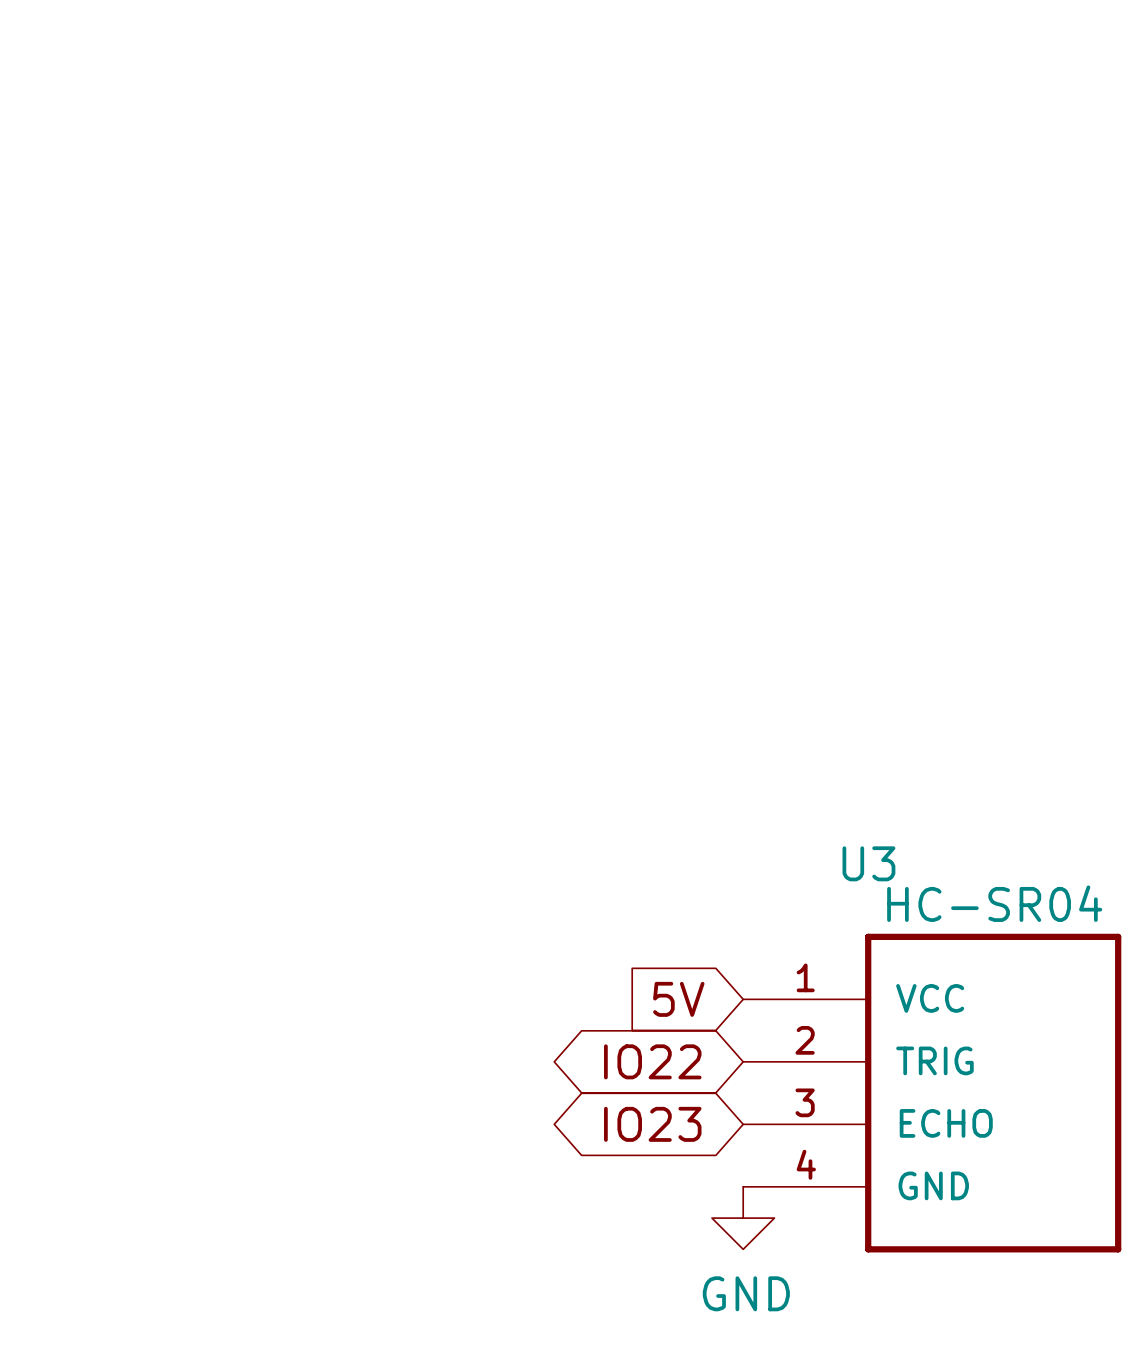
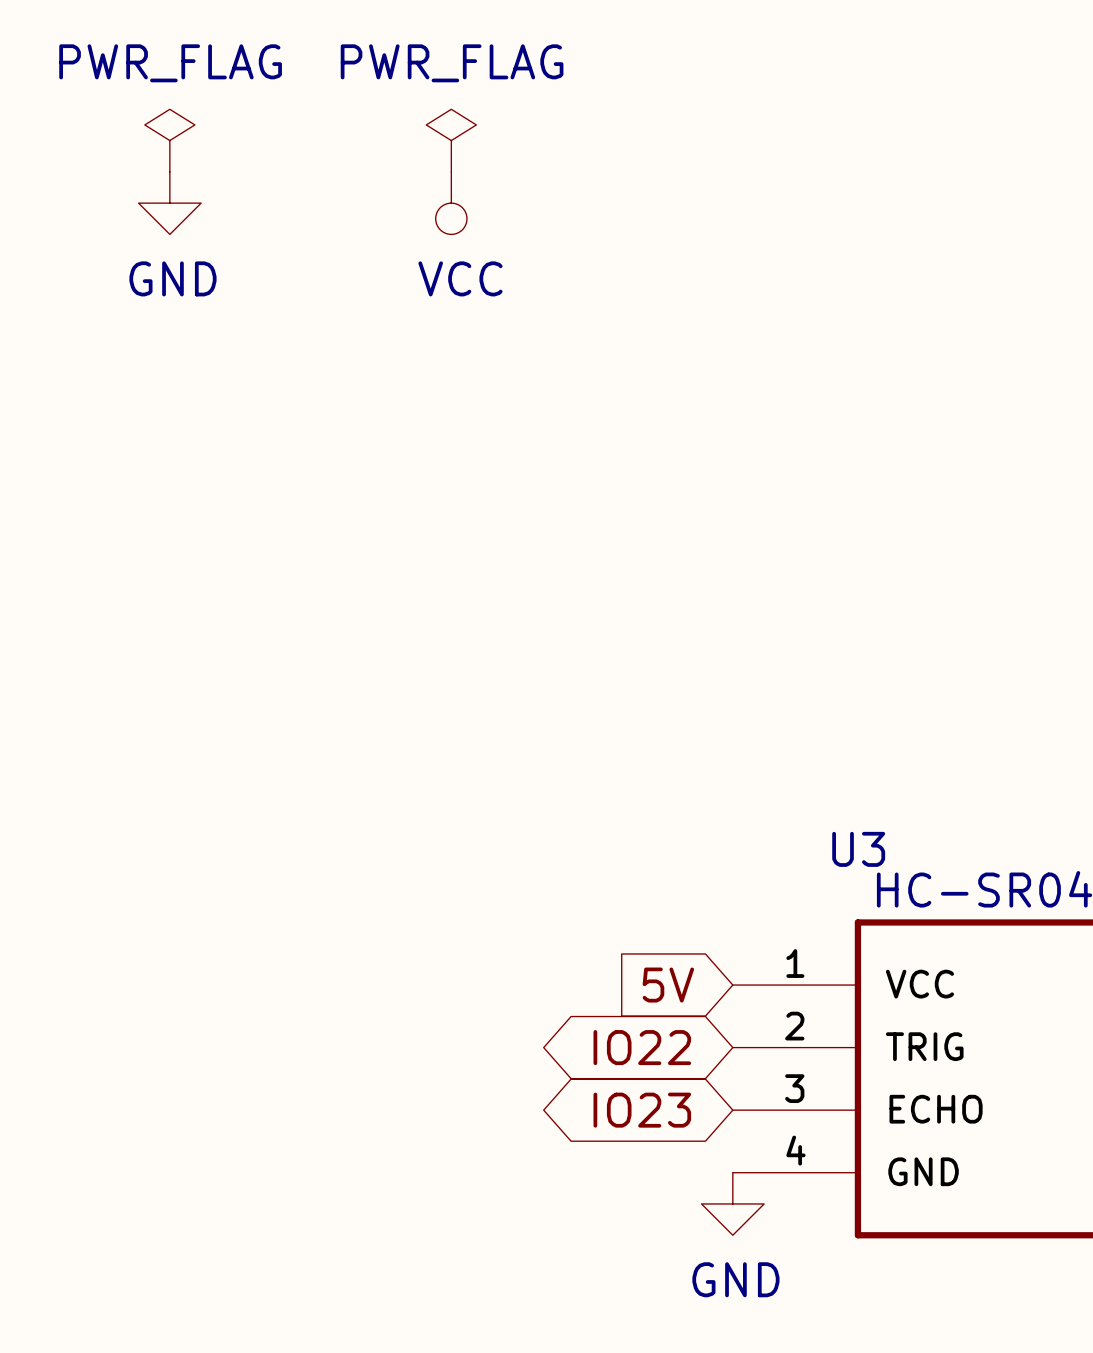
power symbol: none -> PWR_FLAG (169, 140)
power symbol: none -> PWR_FLAG (451, 140)
power symbol: none -> GND (169, 203)
power symbol: none -> VCC (451, 203)

